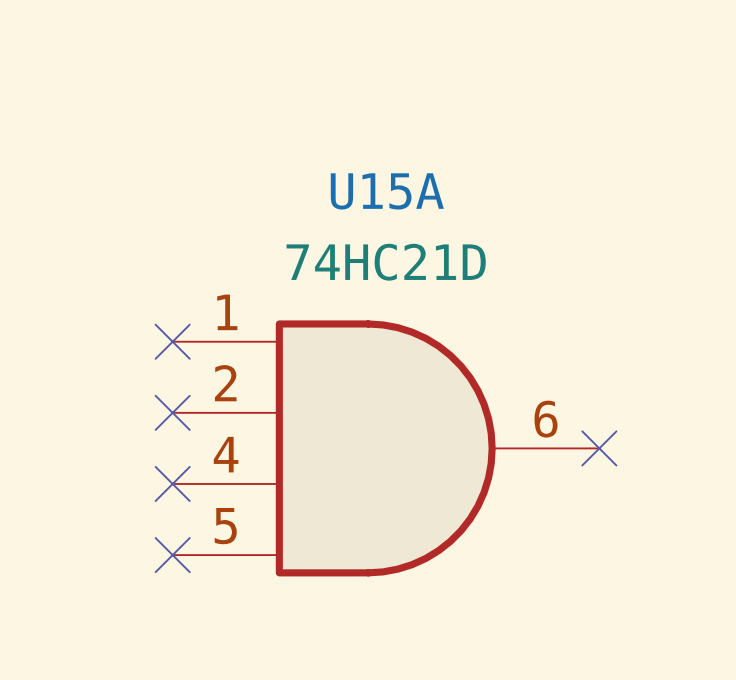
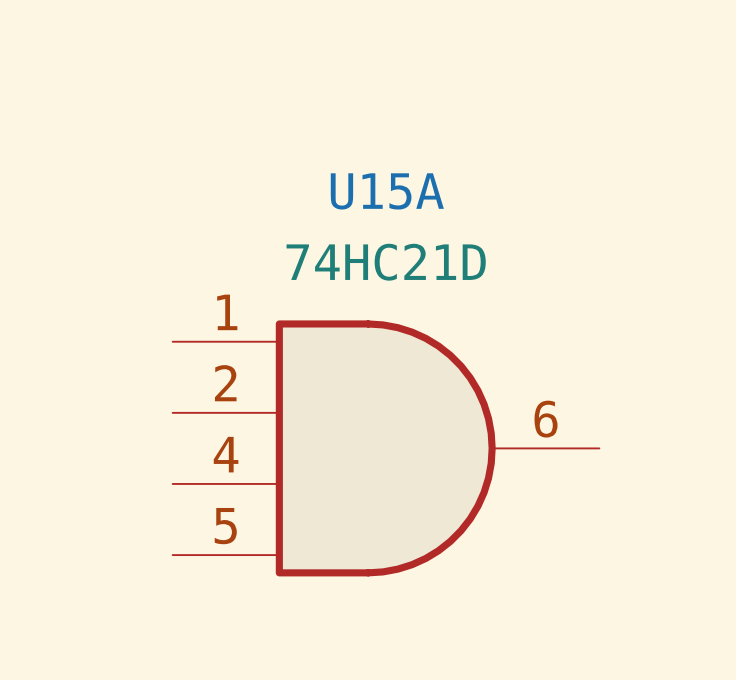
no-connect mark: (172, 341) -> none
no-connect mark: (172, 412) -> none
no-connect mark: (599, 448) -> none
no-connect mark: (172, 483) -> none
no-connect mark: (172, 555) -> none

